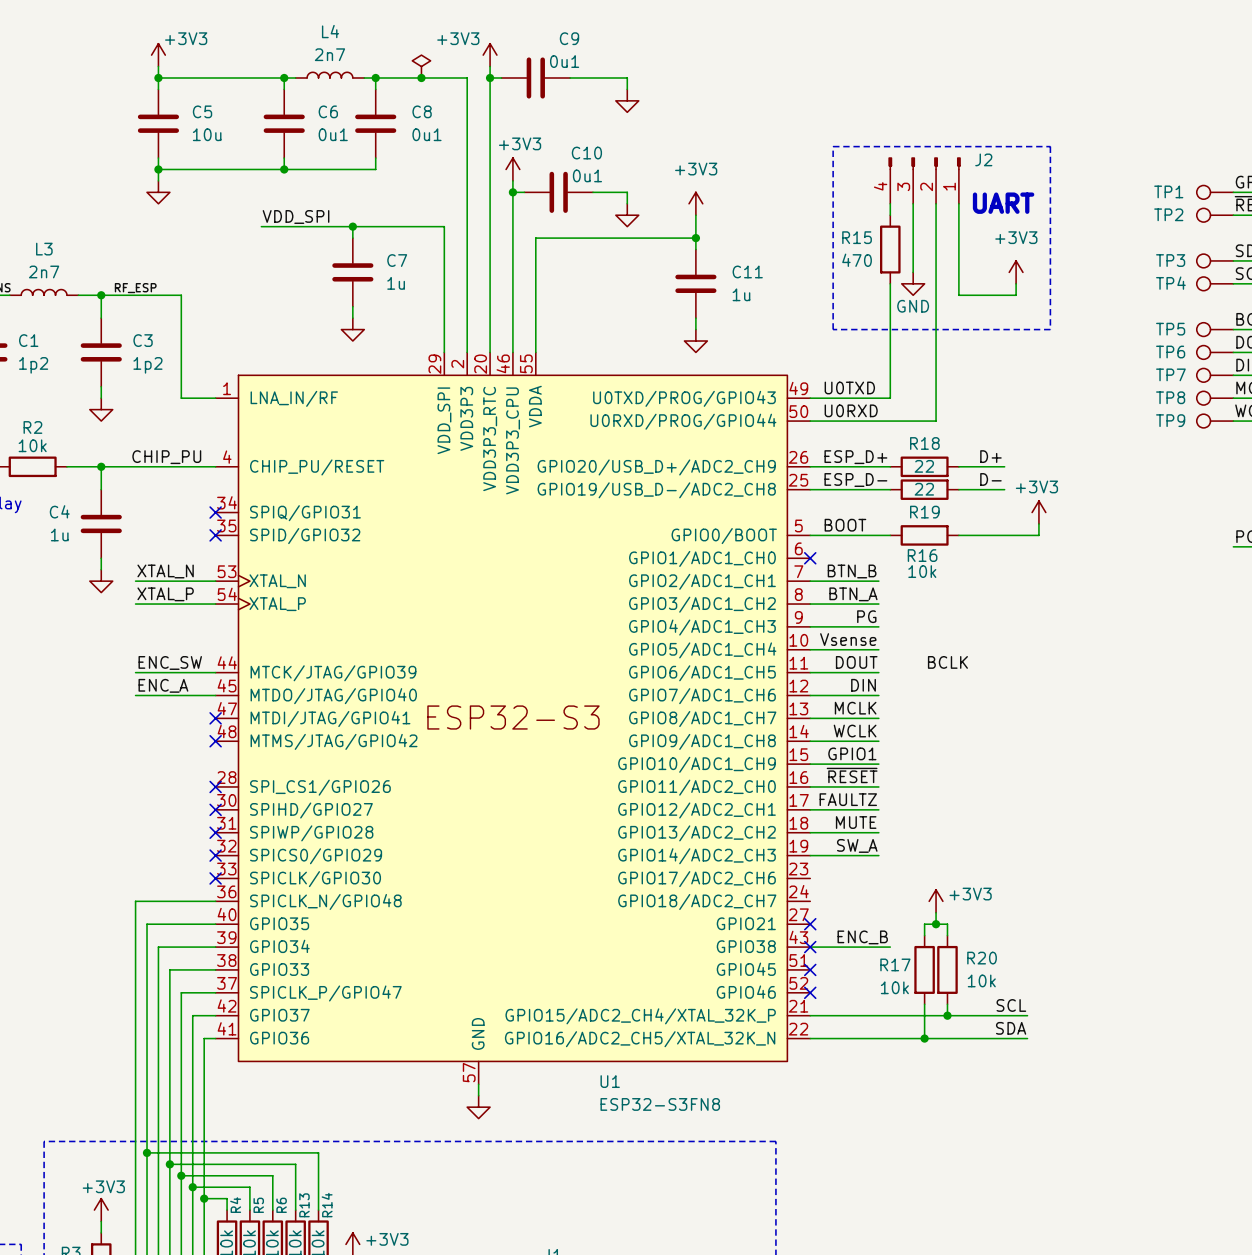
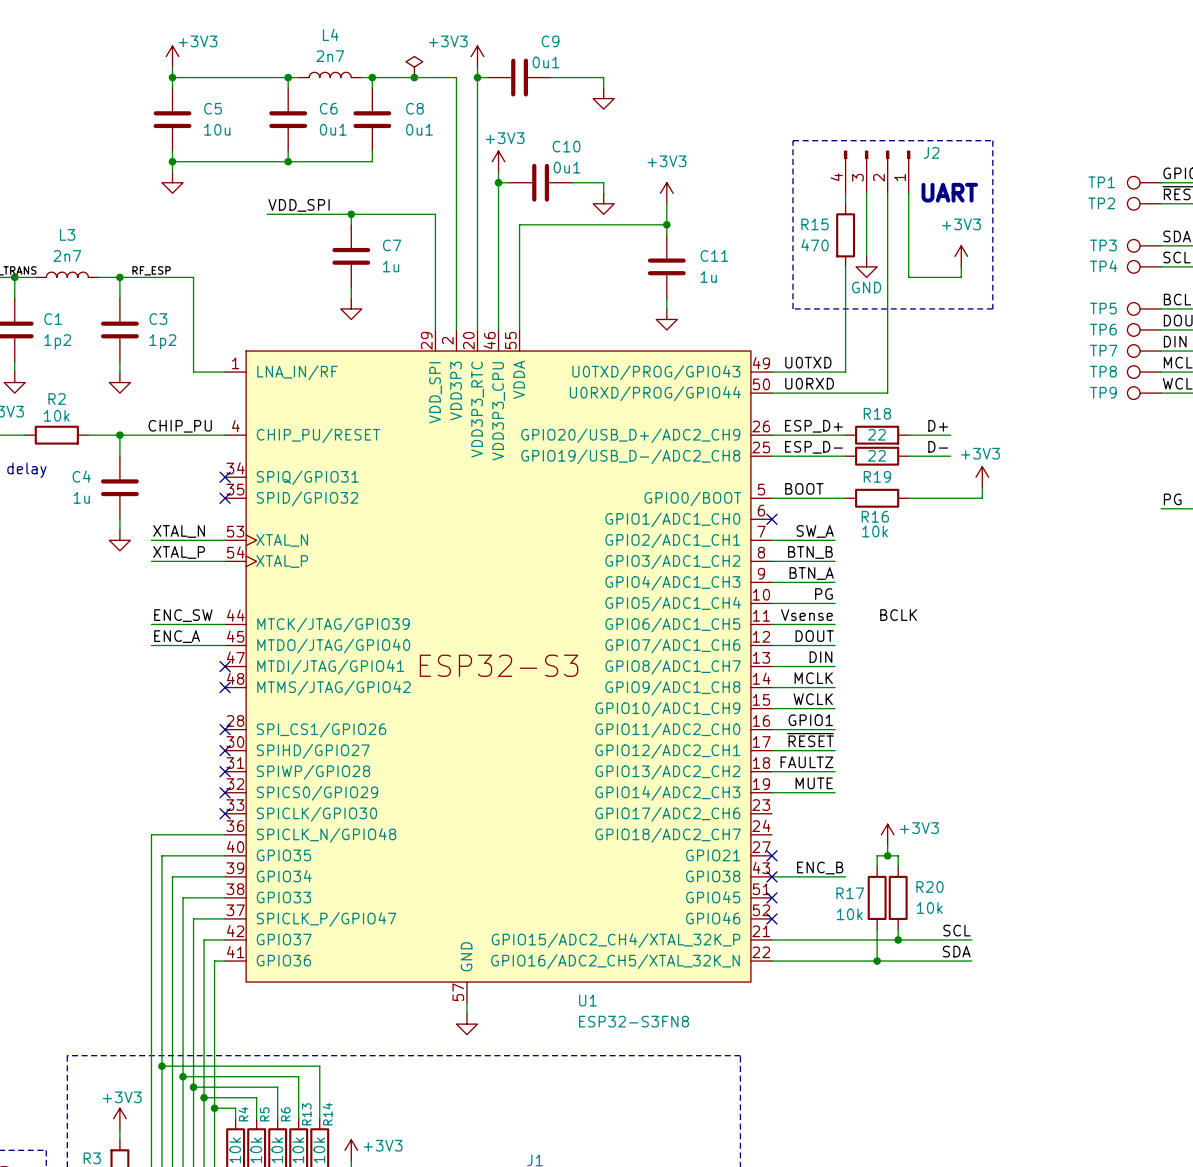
label: BTN_B (852, 571) -> SW_A (815, 531)
label: BTN_A (853, 594) -> BTN_B (810, 552)
label: PG (866, 616) -> BTN_A (811, 573)
label: Vsense (848, 639) -> PG (823, 594)
label: DOUT (856, 662) -> Vsense (806, 615)
label: DIN (863, 685) -> DOUT (814, 636)
label: MCLK (855, 708) -> DIN (820, 657)
label: WCLK (855, 731) -> MCLK (813, 678)
label: GPIO1 (852, 753) -> WCLK (813, 699)
label: ~{RESET} (852, 775) -> GPIO1 (810, 720)
label: FAULTZ (848, 799) -> ~{RESET} (810, 740)
label: MUTE (856, 822) -> FAULTZ (806, 762)
label: SW_A (857, 845) -> MUTE (814, 783)

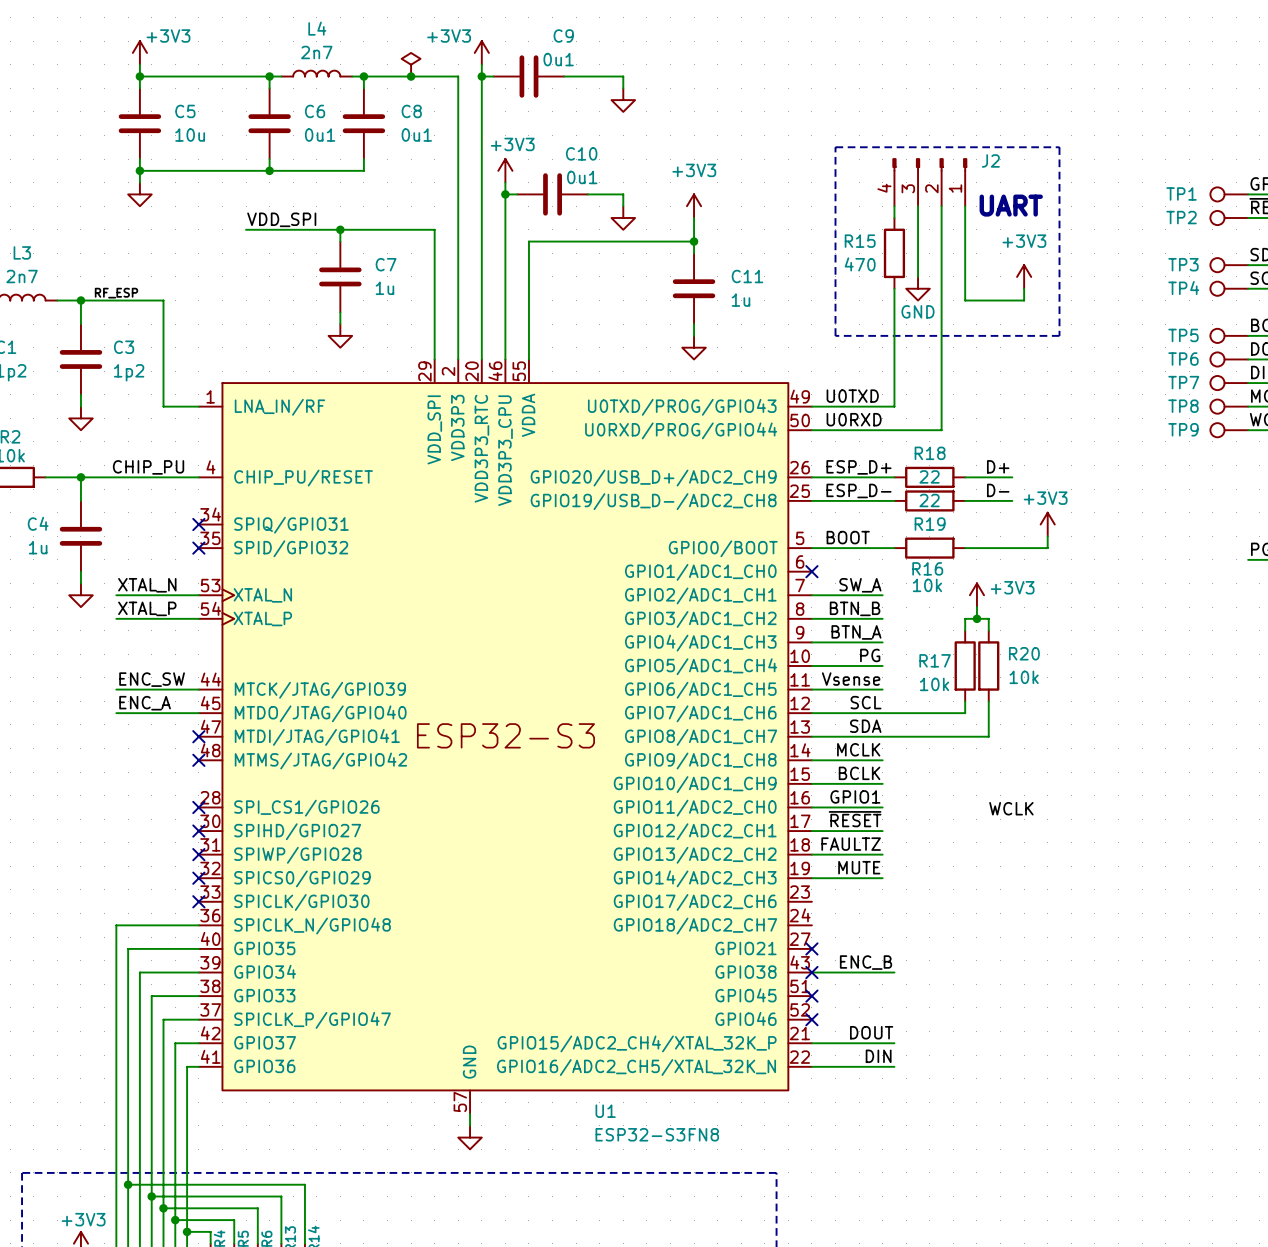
power symbol: none -> +3V3 (976, 595)
wire: none -> (976, 607) (976, 618)
junction: none -> (976, 618)
wire: none -> (965, 630) (965, 618) (988, 618) (988, 630)
label: BCLK (898, 615) -> none
wire: none -> (965, 701) (965, 713) (882, 713)
wire: none -> (988, 701) (988, 736) (882, 736)
label: DOUT (814, 636) -> SCL (866, 702)
label: DIN (820, 657) -> SDA (865, 726)
label: WCLK (813, 699) -> BCLK (859, 773)
label: none -> WCLK (1011, 808)
power symbol: +3V3 (887, 834) -> none
wire: (887, 845) (887, 855) -> none
junction: (887, 855) -> none
wire: (877, 866) (877, 855) (898, 855) (898, 866) -> none
R17 position: (877, 897) -> (965, 665)
R20 position: (898, 897) -> (988, 665)
wire: (877, 929) (877, 961) -> none
wire: (898, 929) (898, 939) -> none
label: none -> DOUT (871, 1032)
label: SCL (956, 930) -> none
wire: (845, 939) (971, 939) -> none
junction: (898, 939) -> none
label: none -> DIN (878, 1056)
label: SDA (956, 951) -> none
wire: (845, 961) (971, 961) -> none
junction: (877, 961) -> none

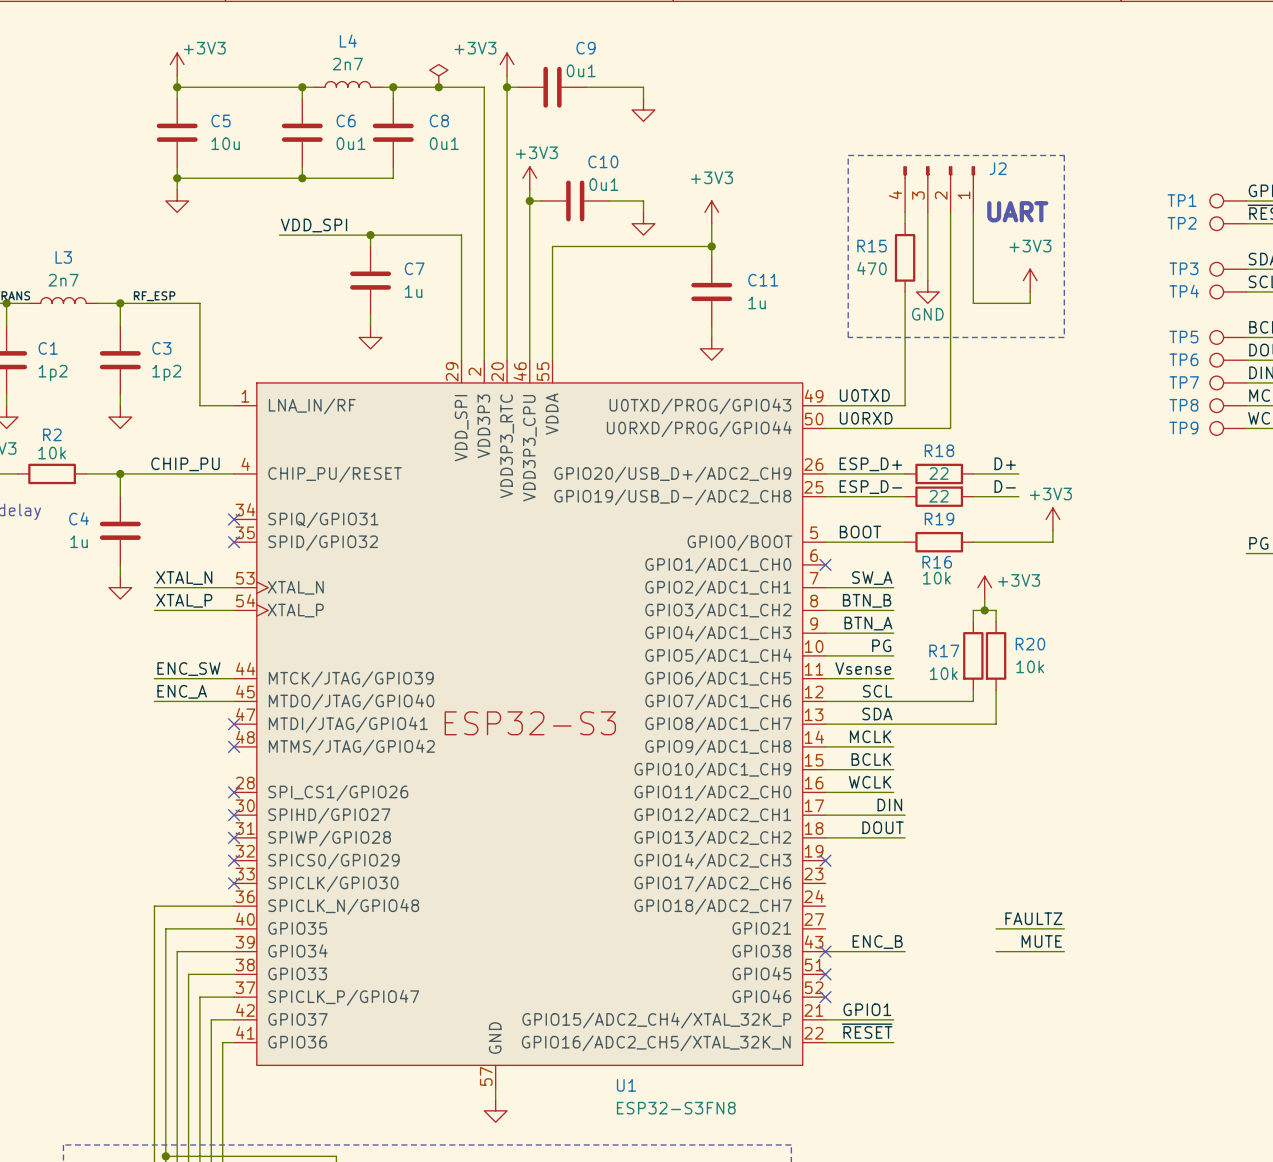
label: GPIO1 (855, 796) -> WCLK (870, 782)
label: WCLK (1011, 808) -> none
label: ~{RESET} (855, 819) -> none
label: none -> DIN (889, 805)
label position: FAULTZ (851, 844) -> FAULTZ (1033, 918)
label position: MUTE (859, 867) -> MUTE (1041, 941)
wire: (811, 878) (882, 878) -> (996, 928) (1064, 928)
no-connect mark: none -> (825, 860)
no-connect mark: (811, 948) -> none
wire: none -> (996, 951) (1064, 951)
label: none -> GPIO1 (867, 1009)
label position: DOUT (871, 1032) -> DOUT (883, 827)
wire: (882, 1043) (894, 1043) -> (893, 815) (905, 815)
label: none -> ~{RESET} (867, 1031)
label: DIN (878, 1056) -> none
wire: (882, 1066) (894, 1066) -> (893, 837) (905, 837)

